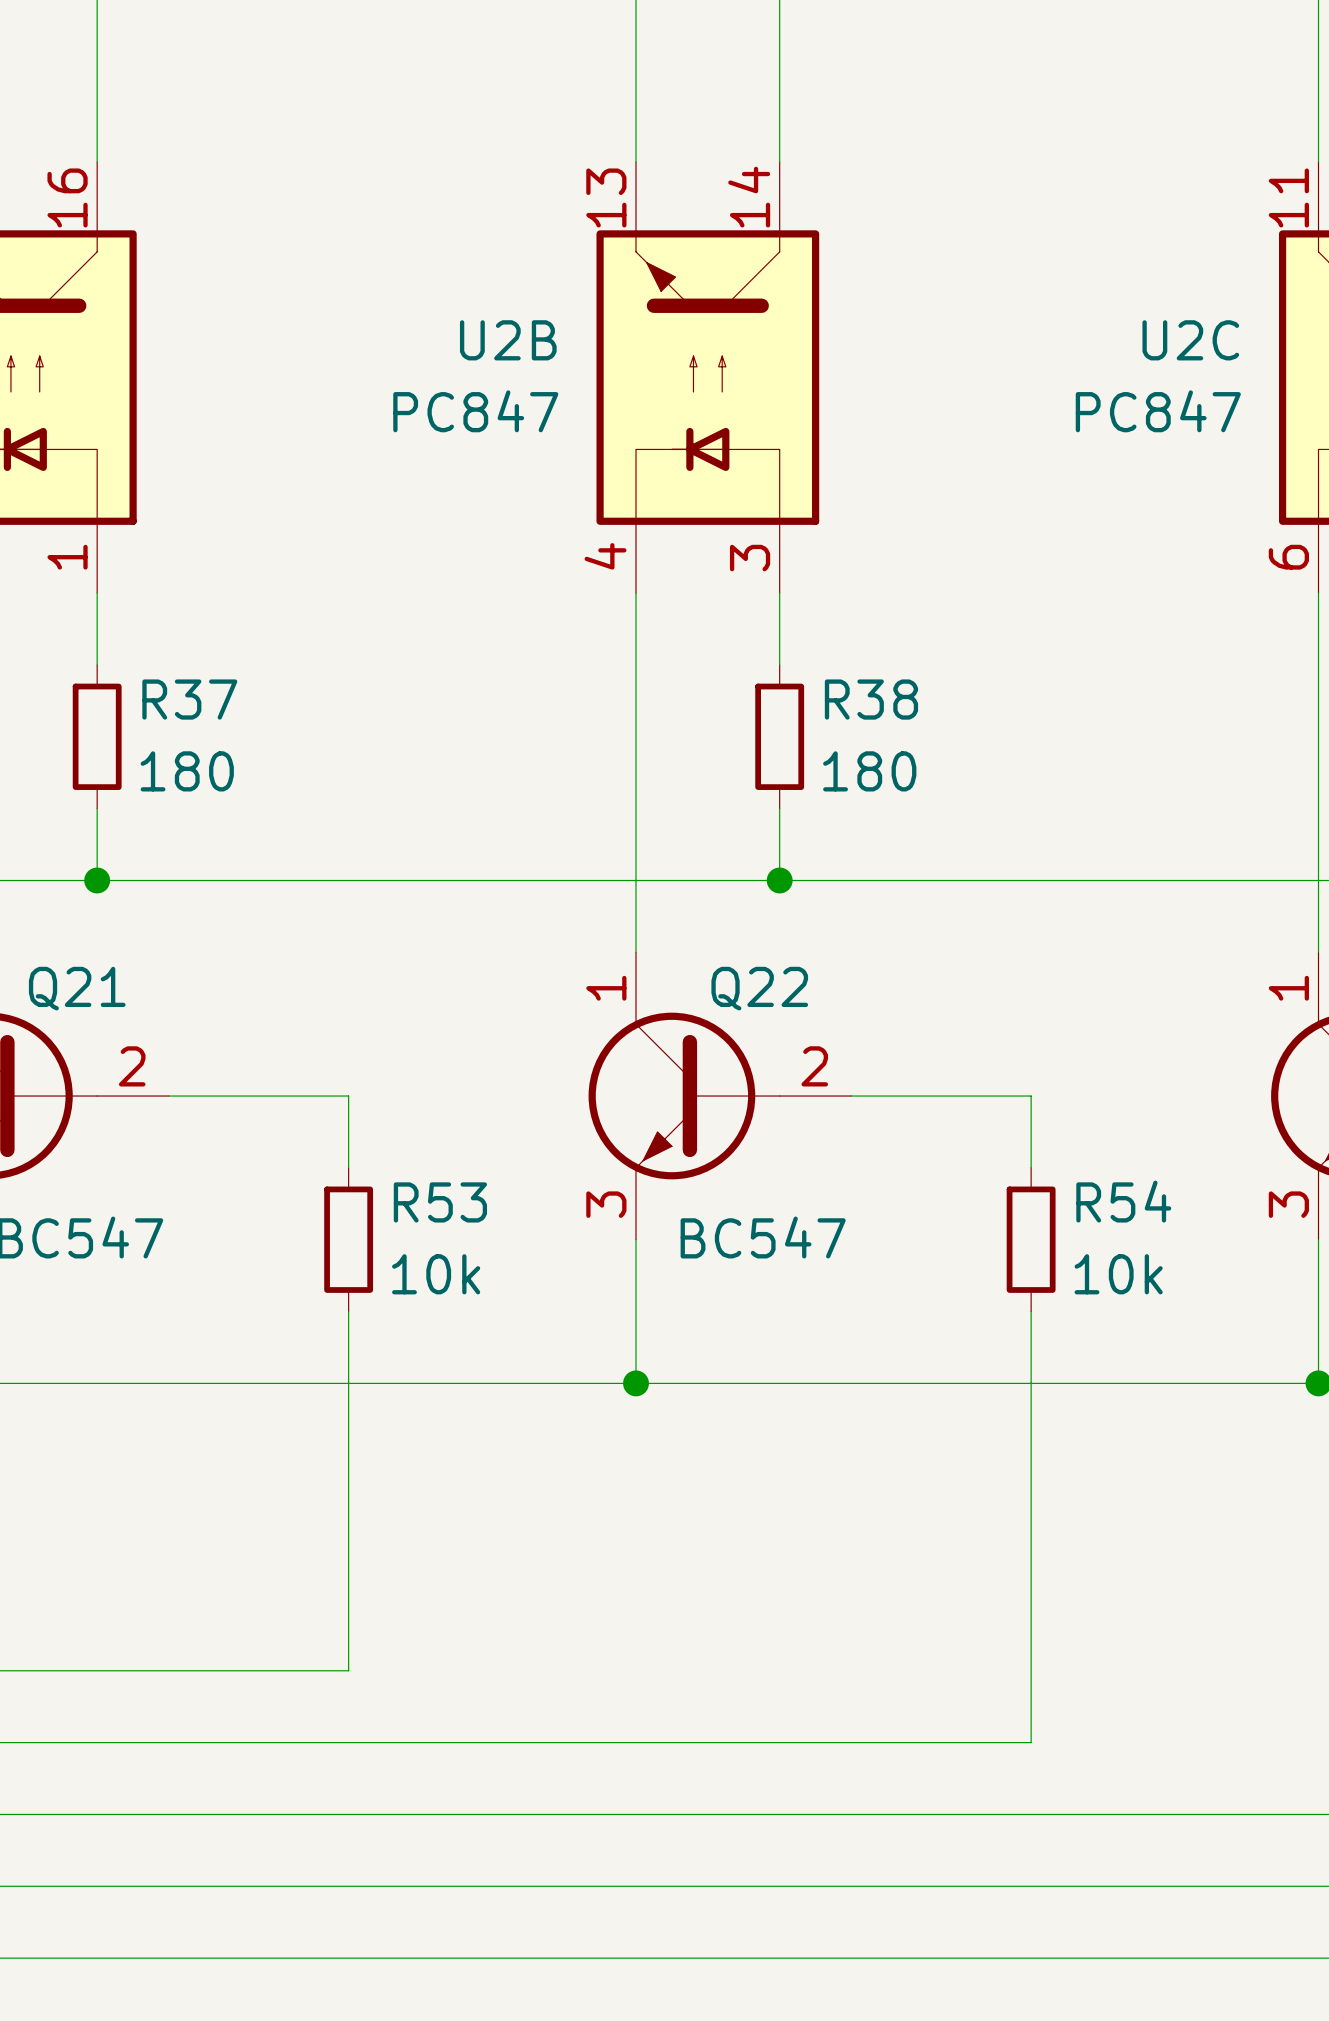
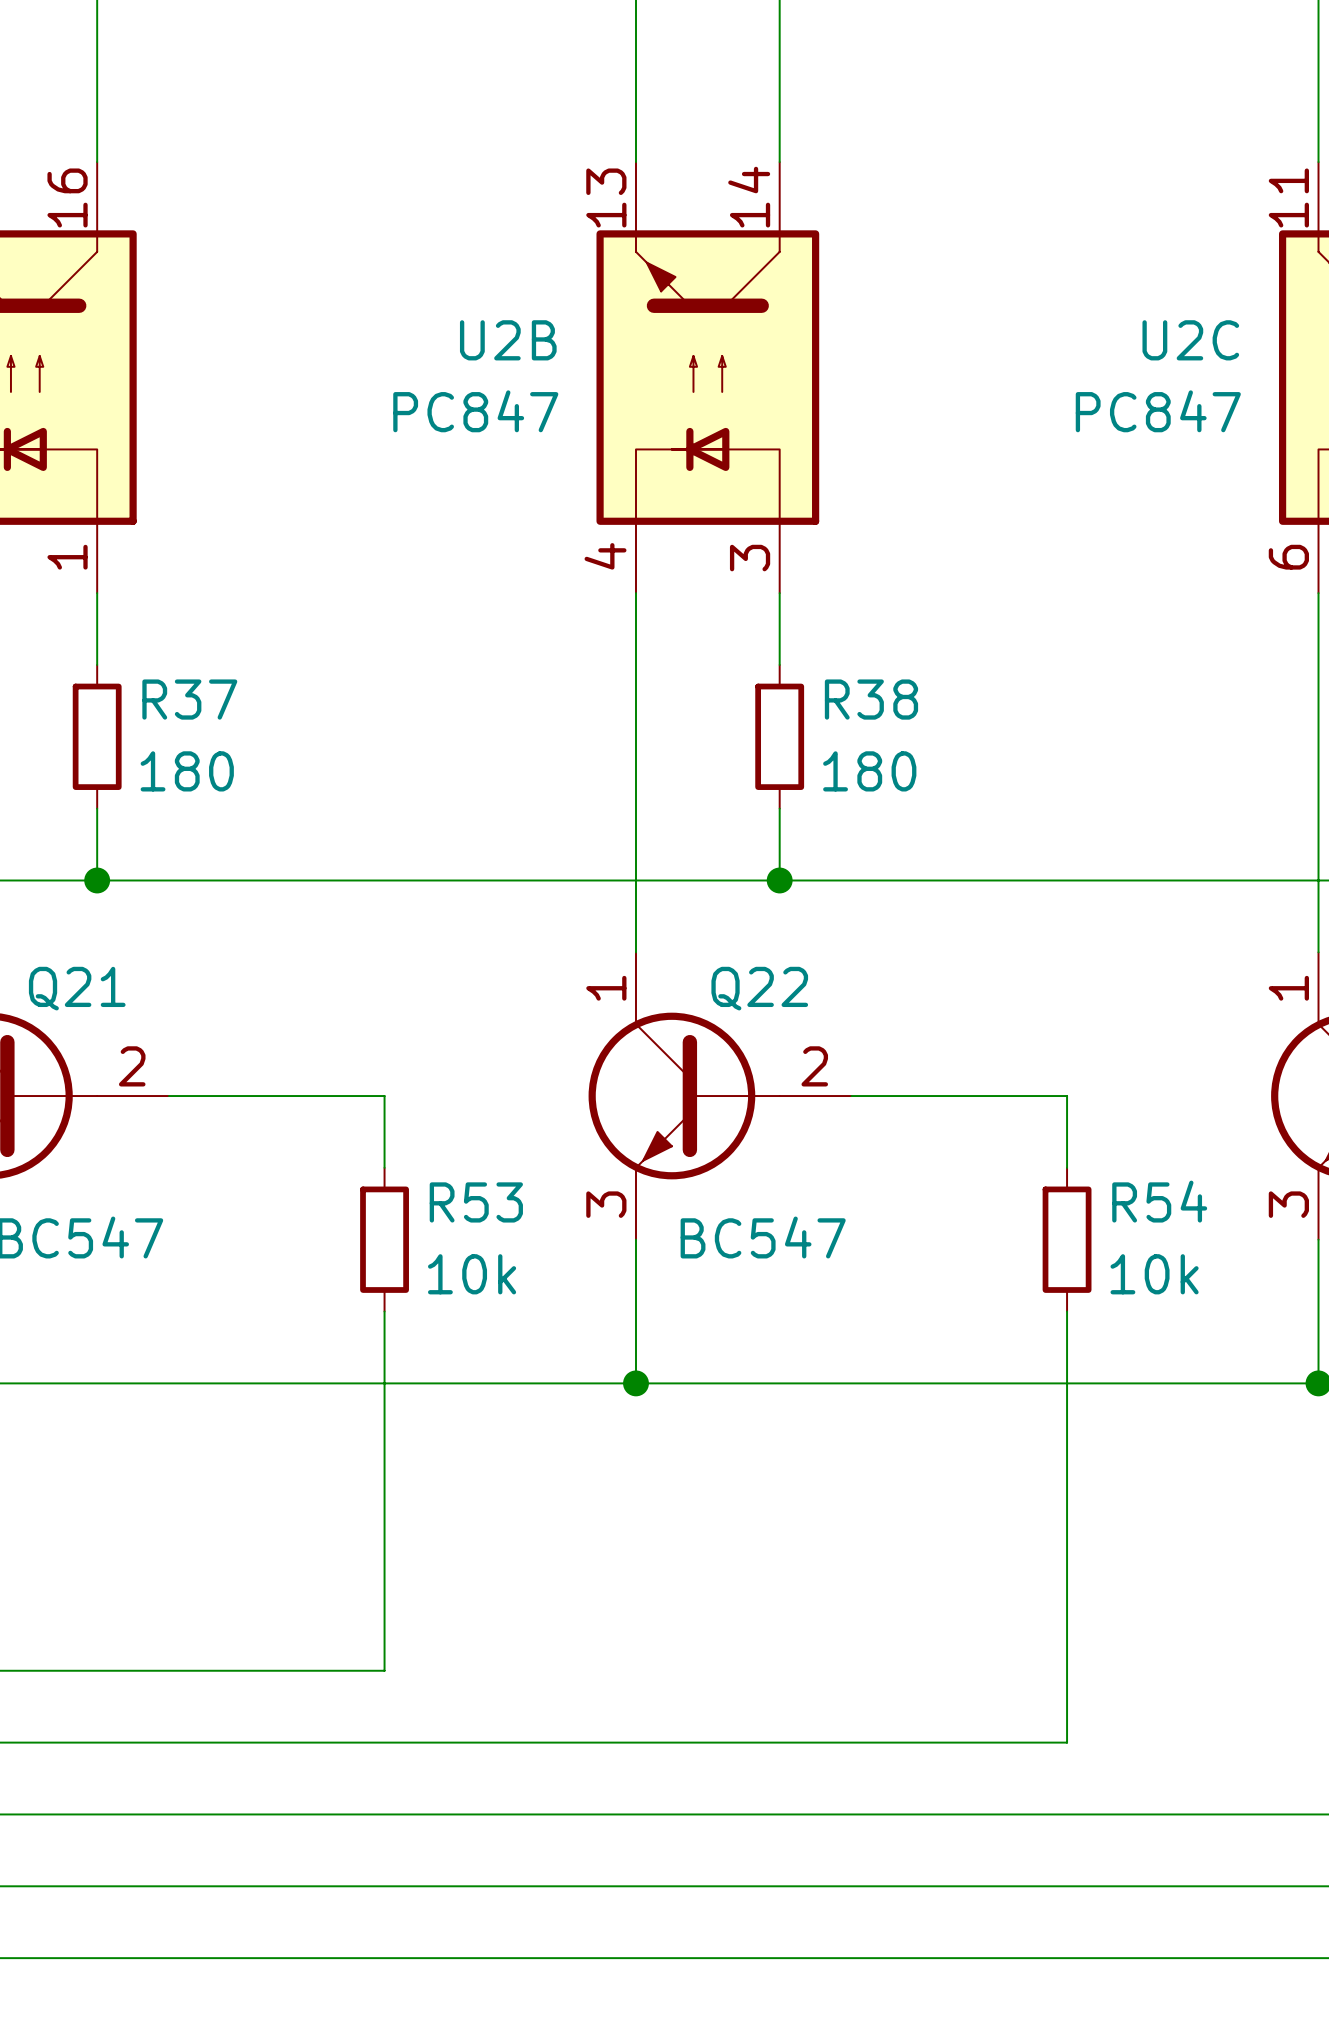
wire: (348, 1096) (348, 1167) -> (348, 1096) (384, 1096) (384, 1167)
wire: (1031, 1096) (1031, 1167) -> (1031, 1096) (1067, 1096) (1067, 1167)
R53 position: (348, 1239) -> (384, 1239)
R54 position: (1031, 1239) -> (1067, 1239)
wire: (348, 1311) (348, 1670) -> (384, 1311) (384, 1670) (348, 1670)
wire: (1031, 1311) (1031, 1742) -> (1067, 1311) (1067, 1742) (1031, 1742)

